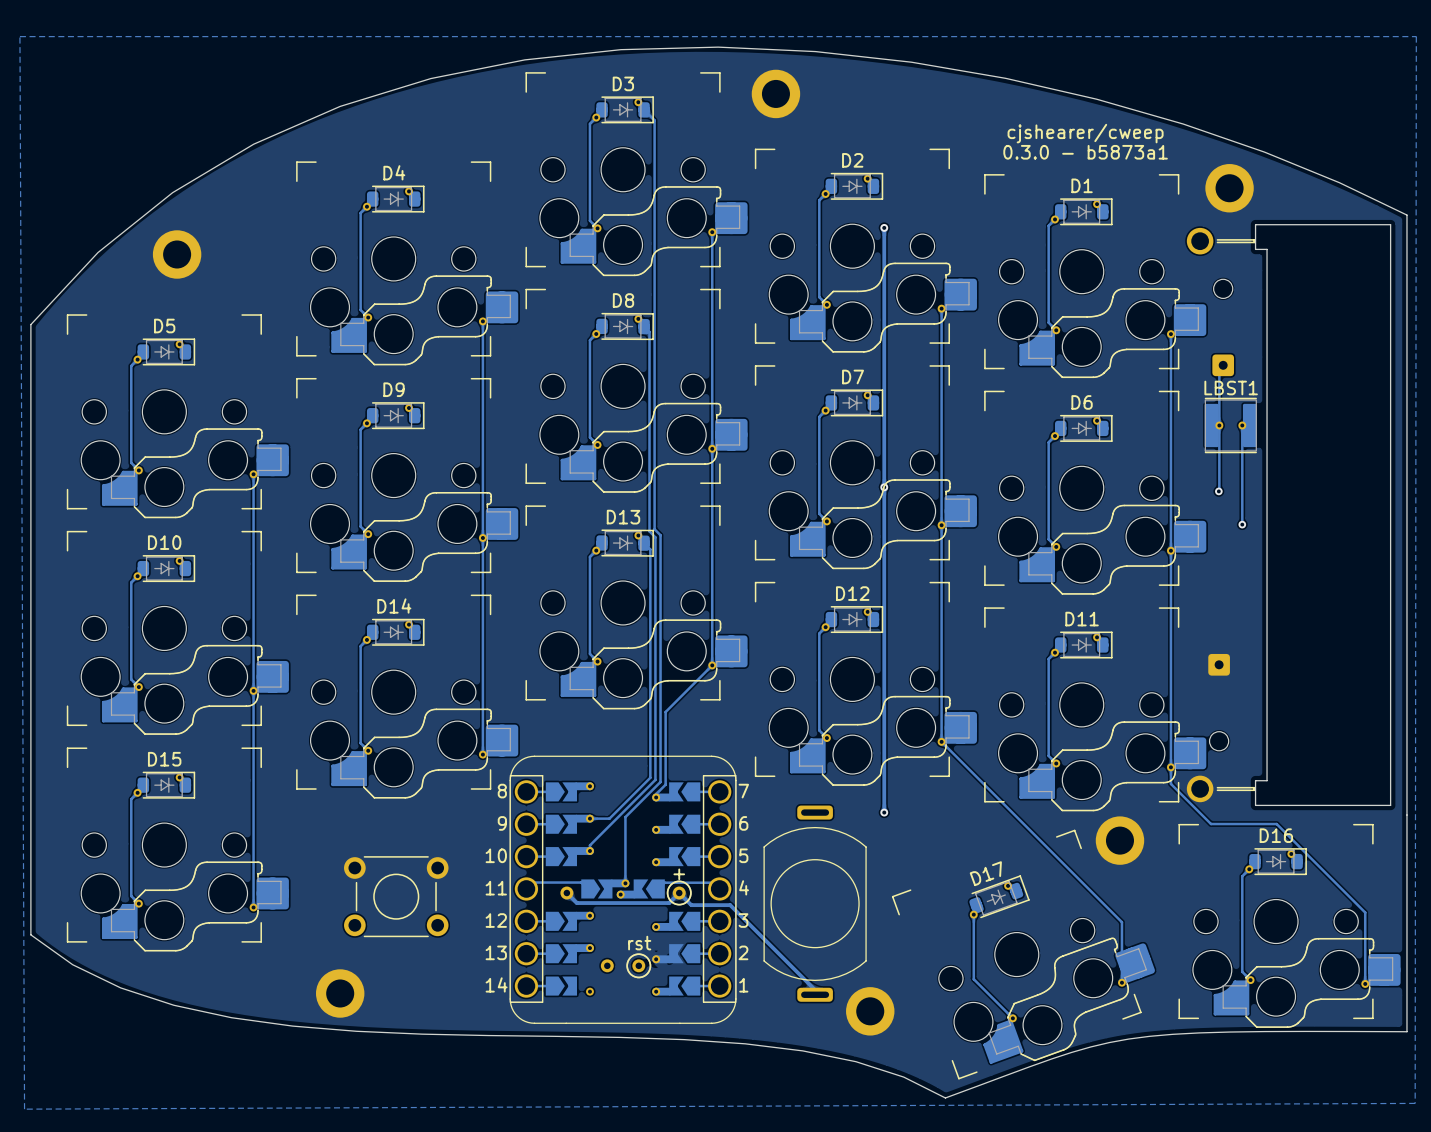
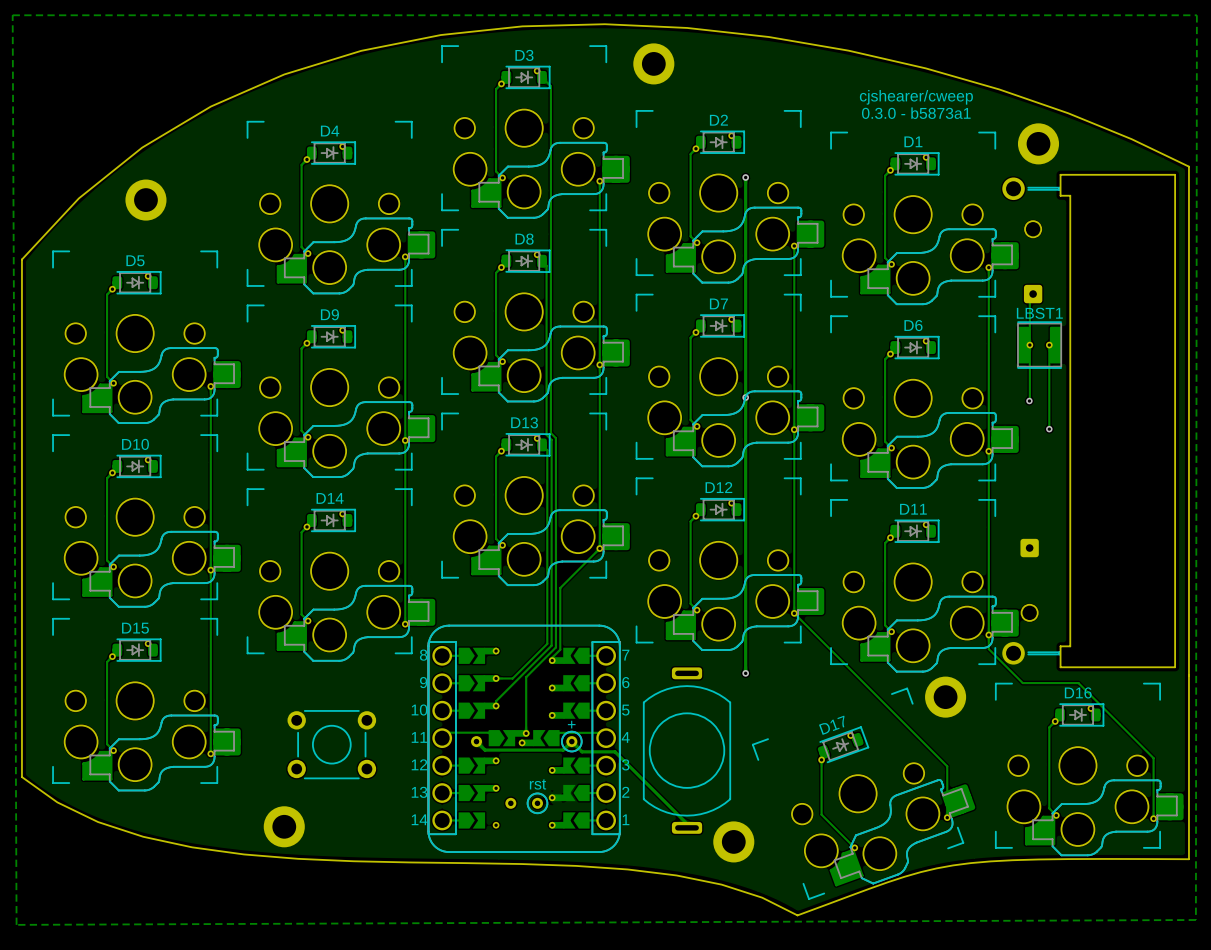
part footprint: [509, 755, 737, 1024] -> [427, 625, 621, 853]

